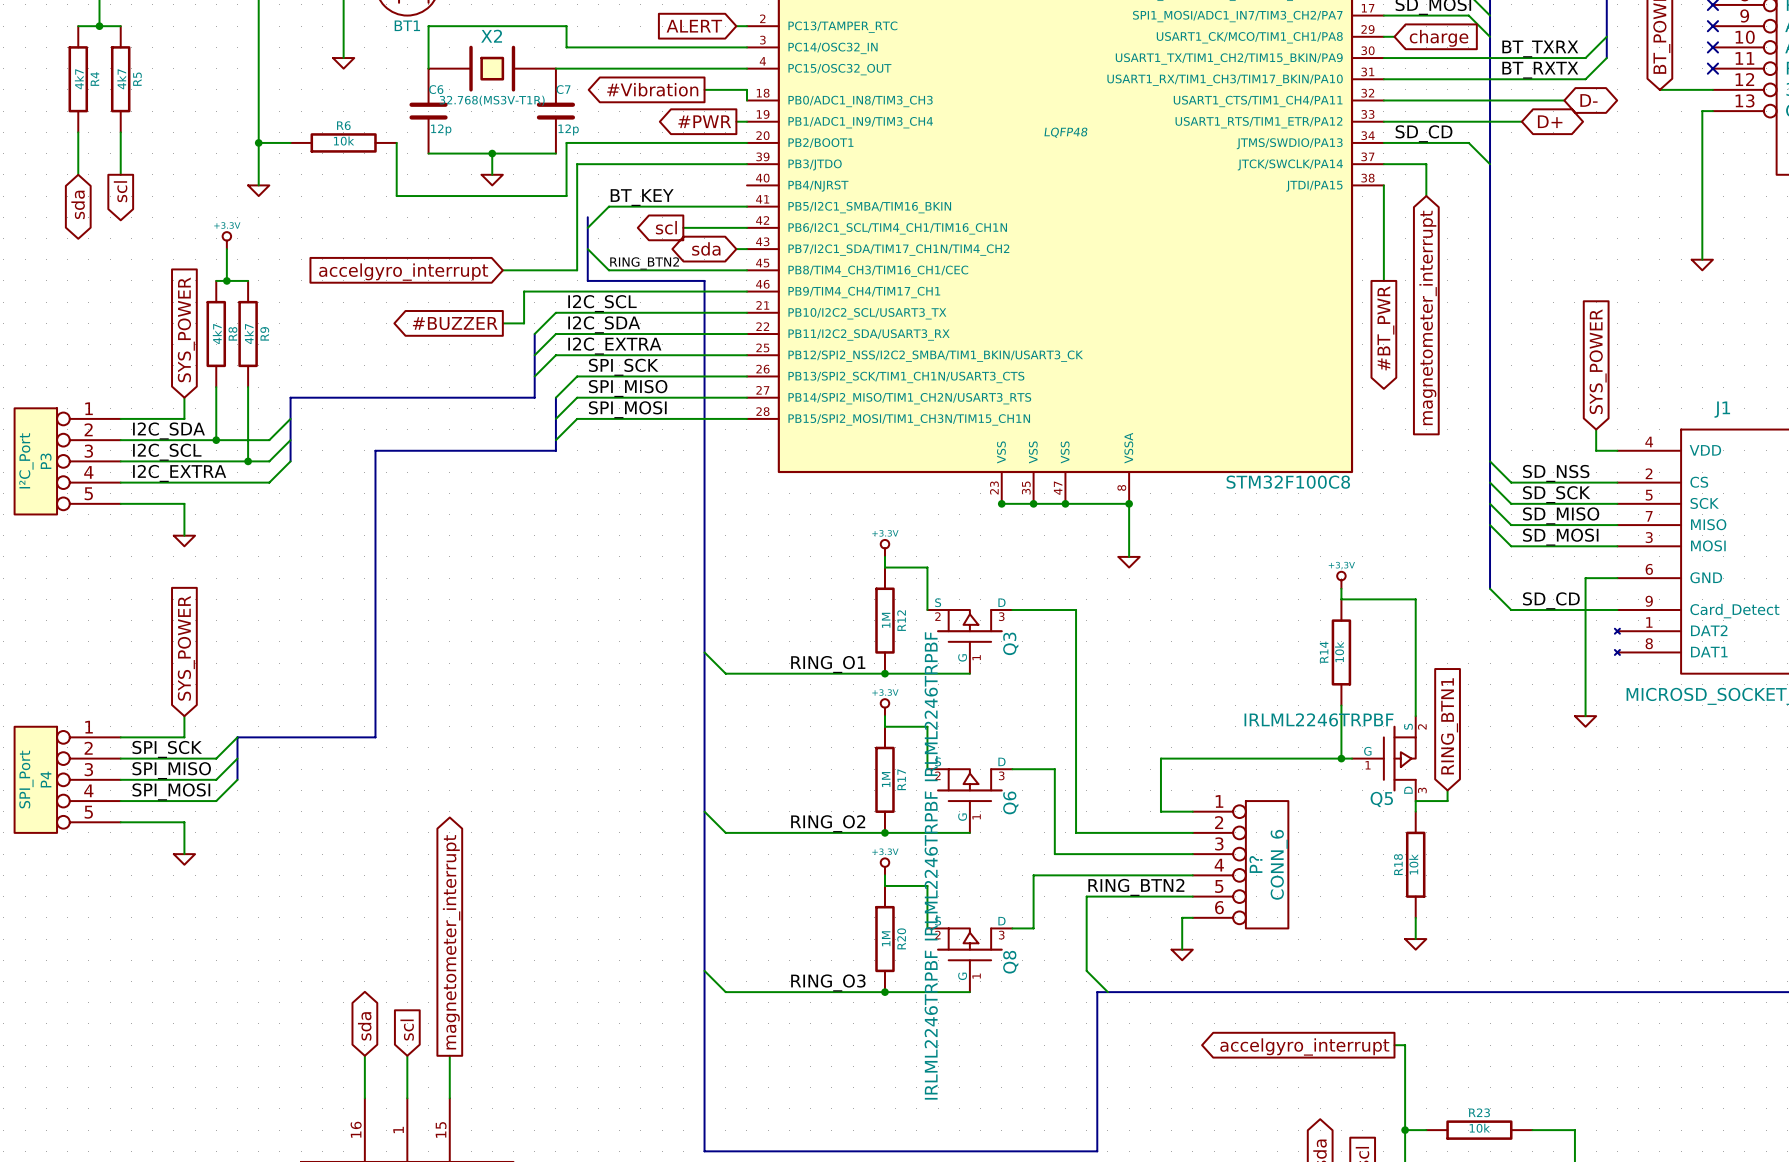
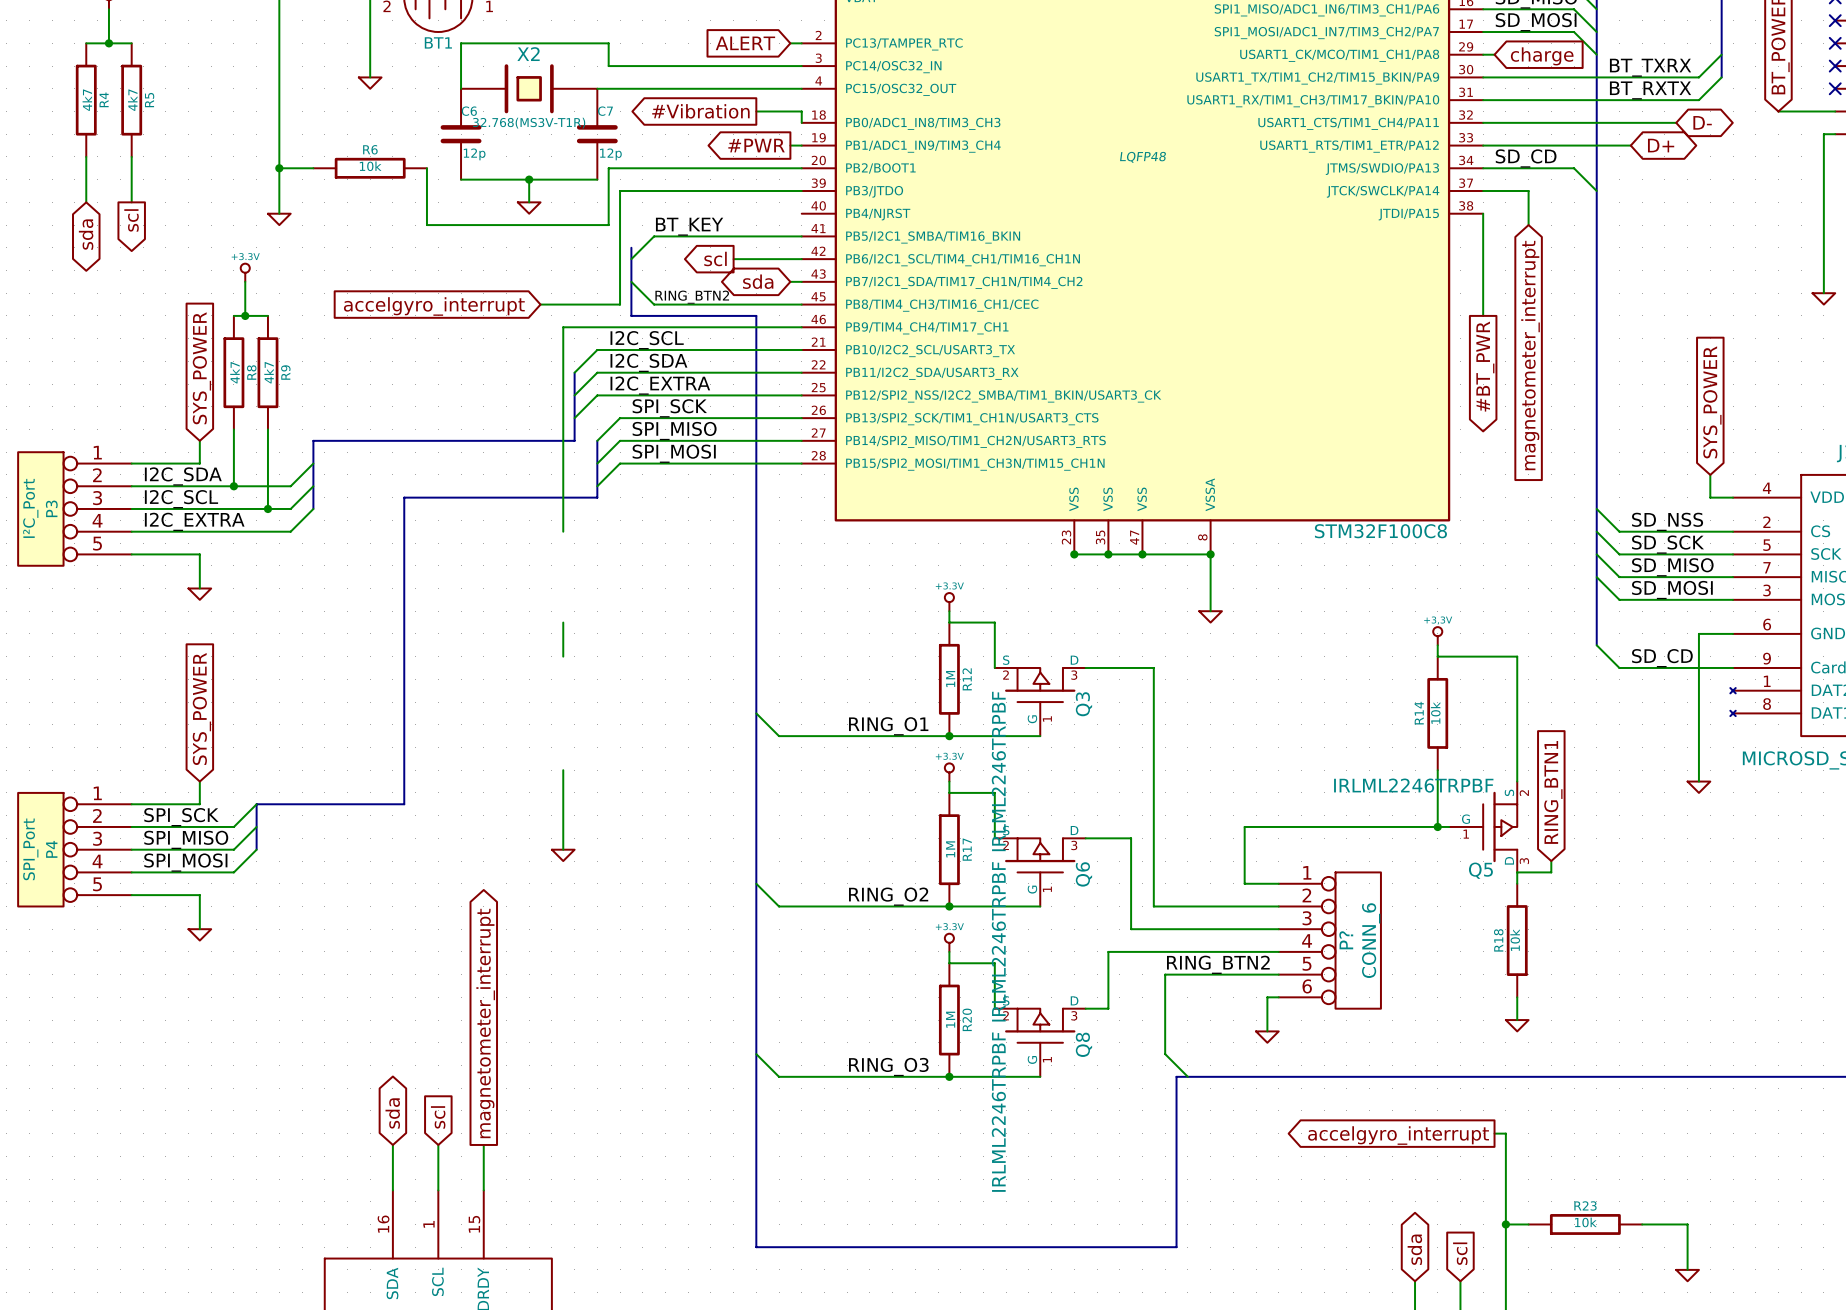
global label: #BUZZER (455, 323) -> none
wire: (502, 323) (524, 323) -> (563, 531) (563, 361)
wire: none -> (563, 622) (563, 656)
wire: none -> (563, 770) (563, 849)
power symbol: none -> (563, 855)

